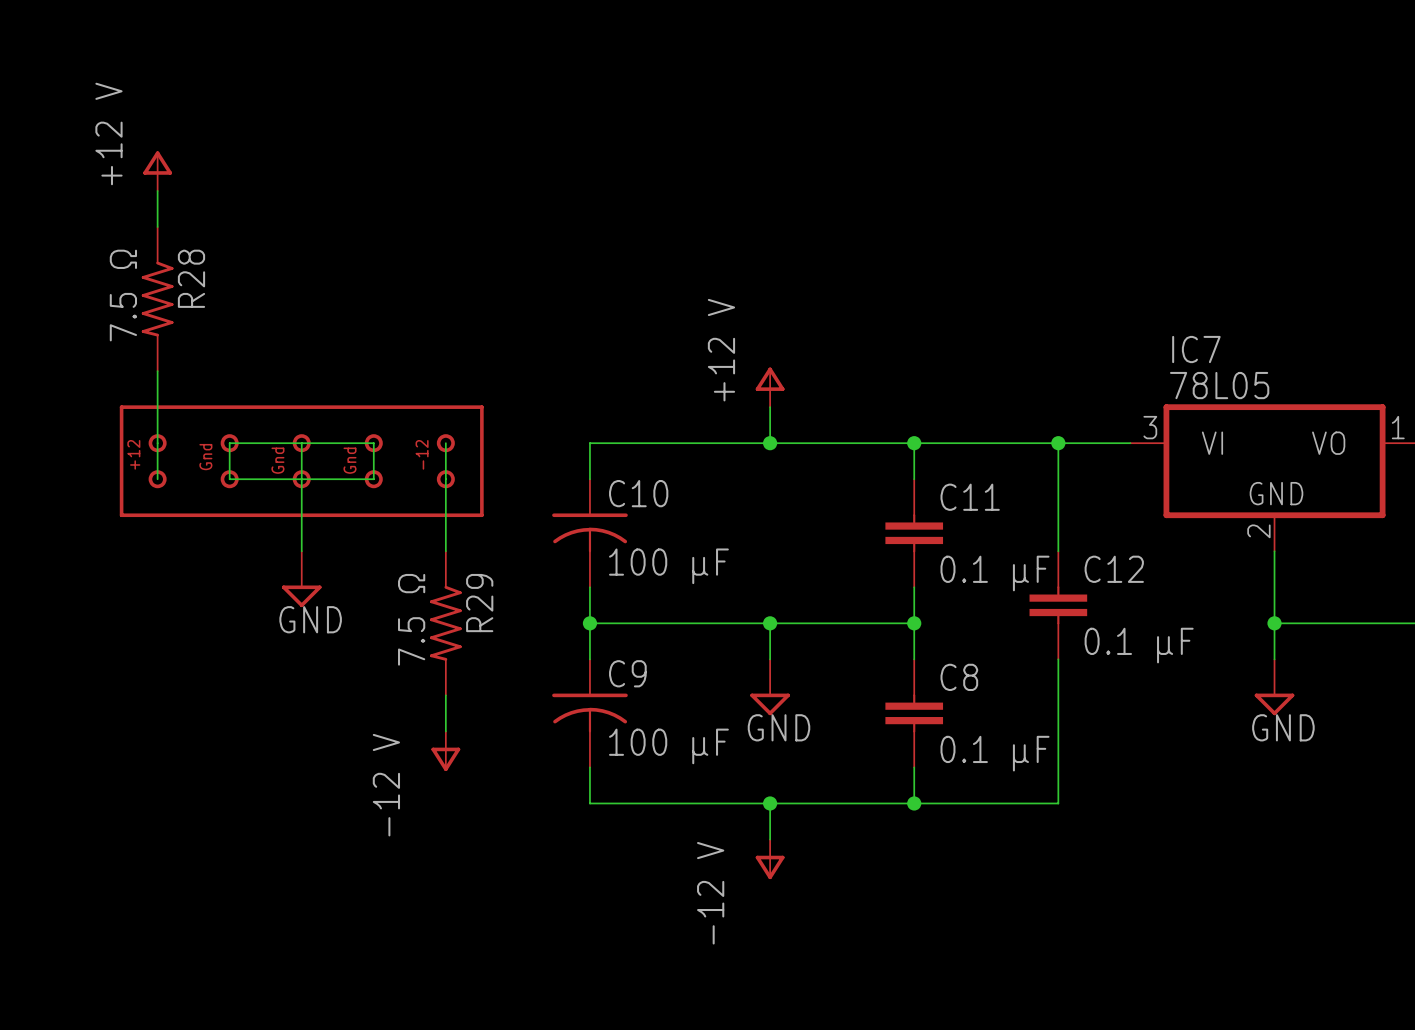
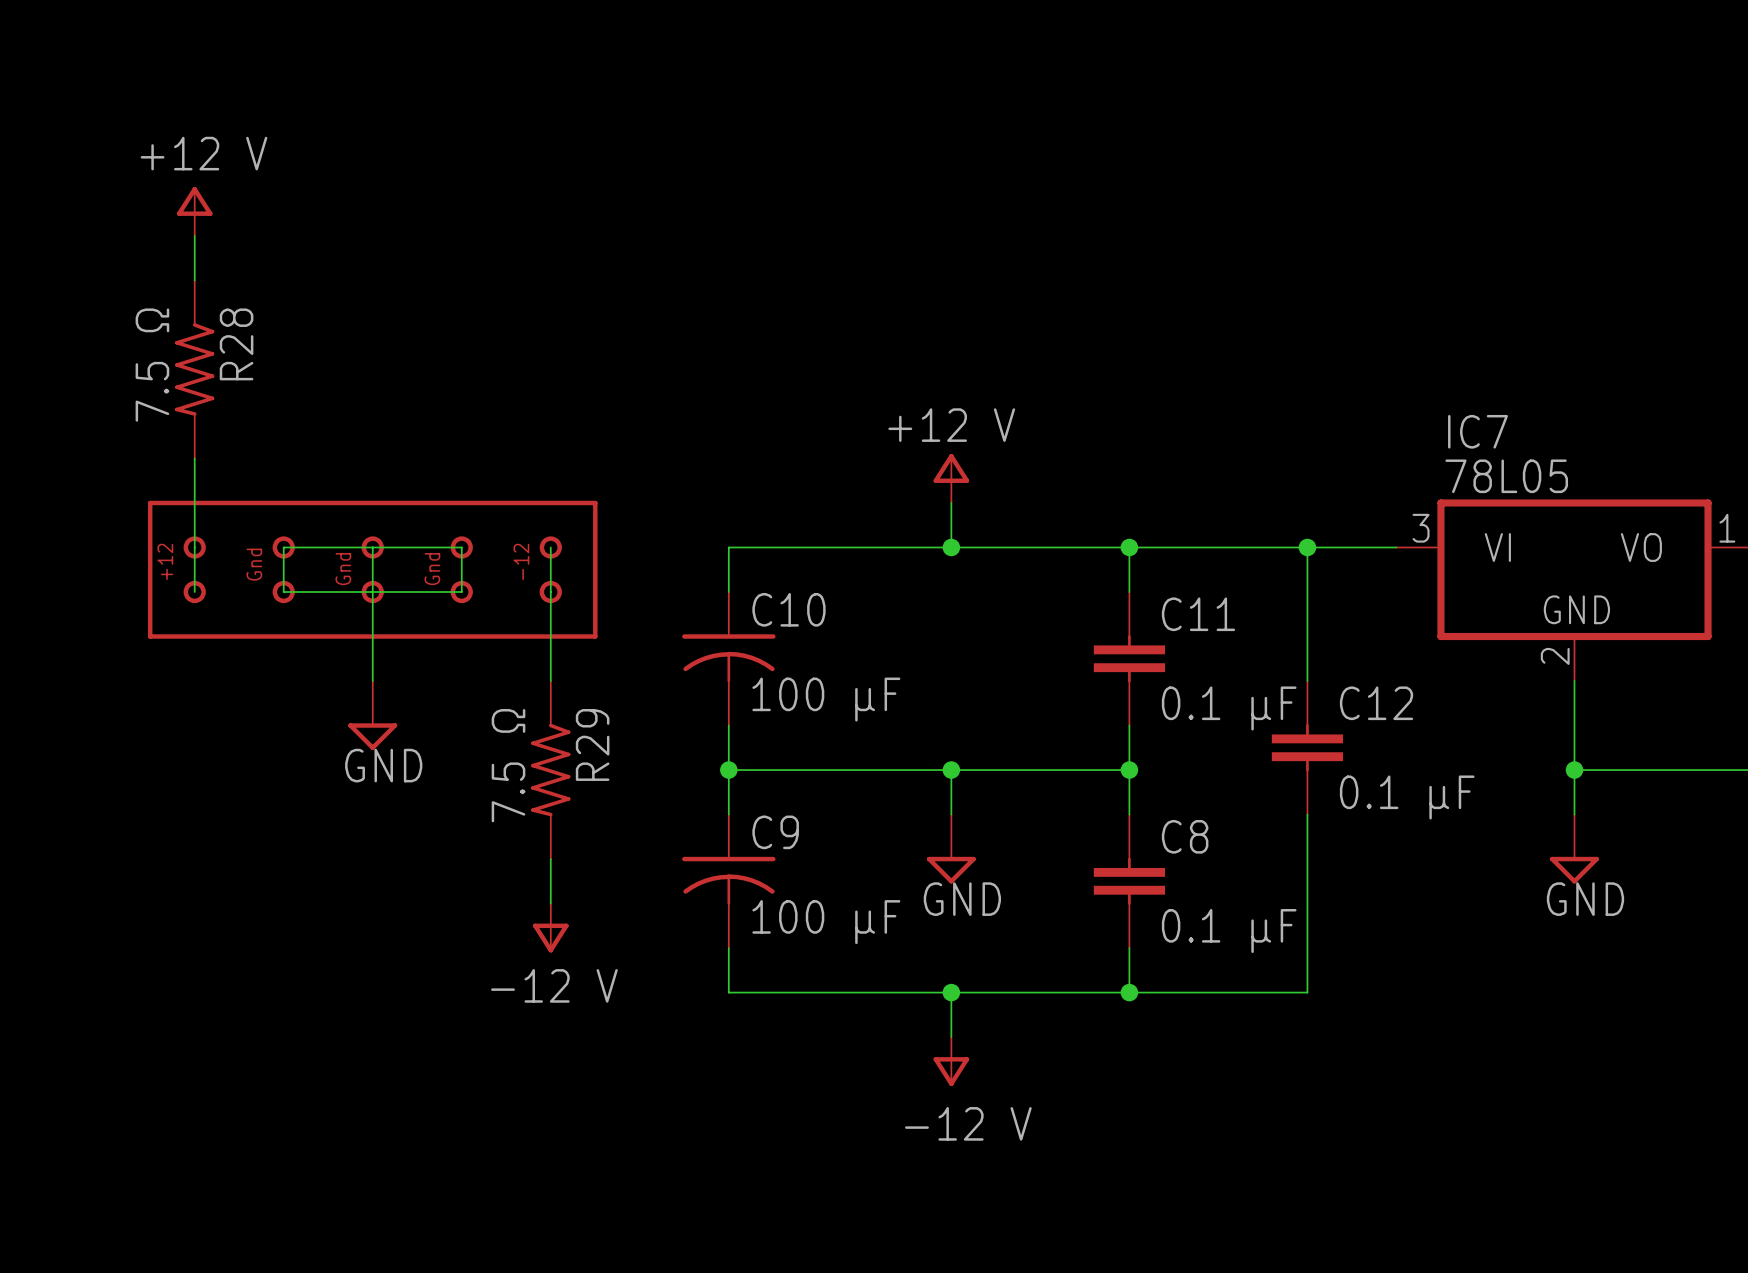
power symbol text rotation: 0° (108, 133) -> 90° clockwise (203, 153)
power symbol text rotation: 0° (721, 350) -> 90° clockwise (951, 425)
power symbol text rotation: 0° (386, 785) -> 90° clockwise (554, 985)
power symbol text rotation: 0° (710, 893) -> 90° clockwise (968, 1123)

